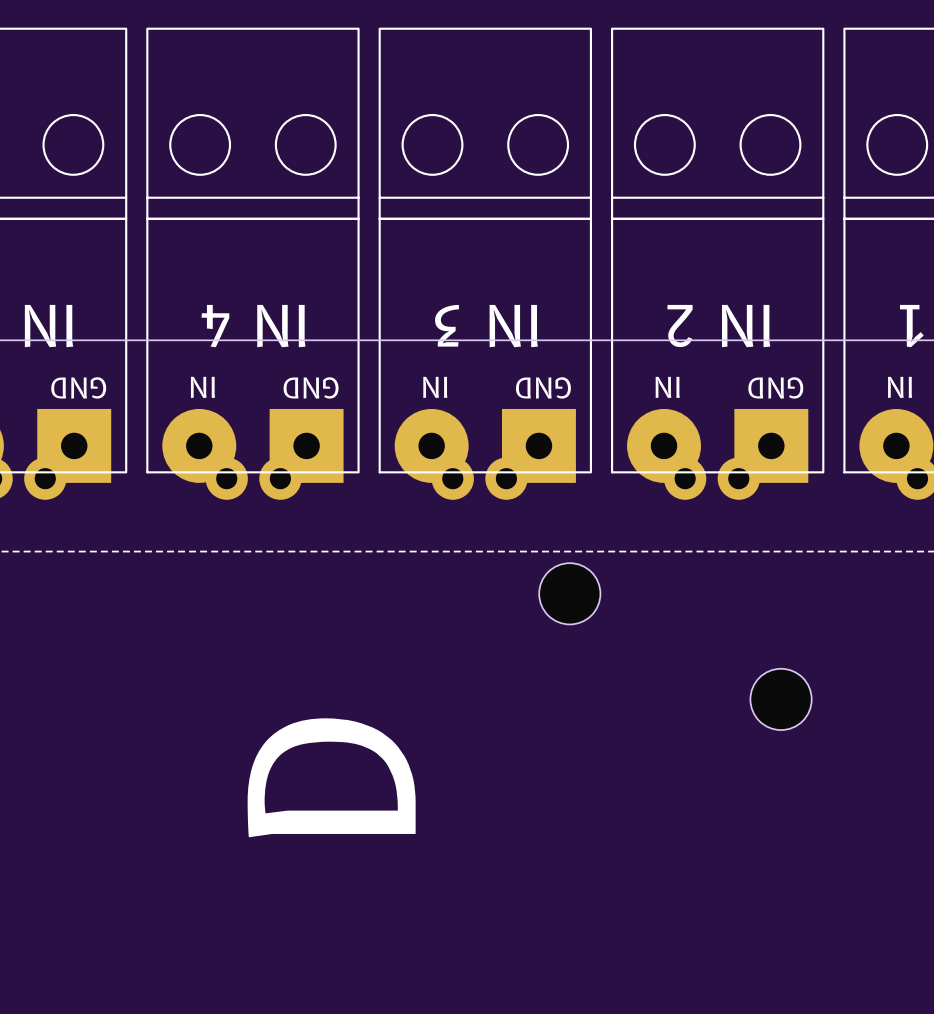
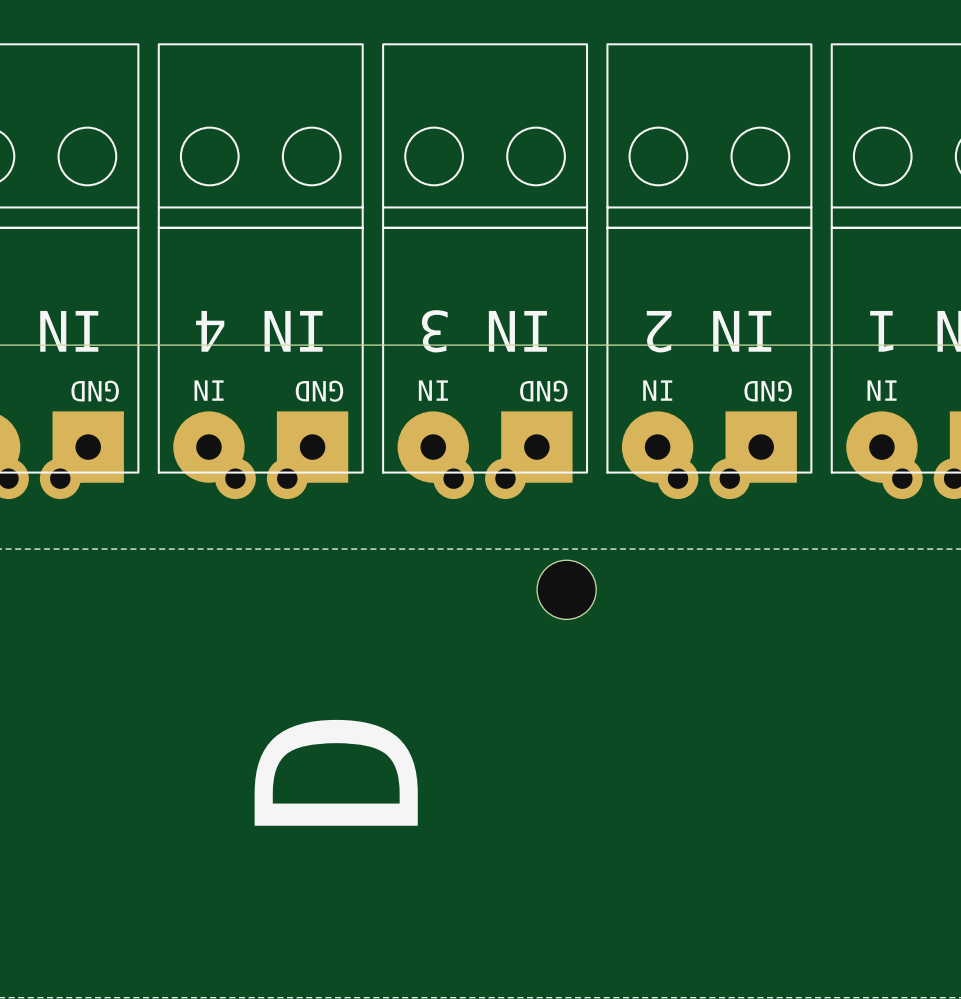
part: (781, 699) -> none

